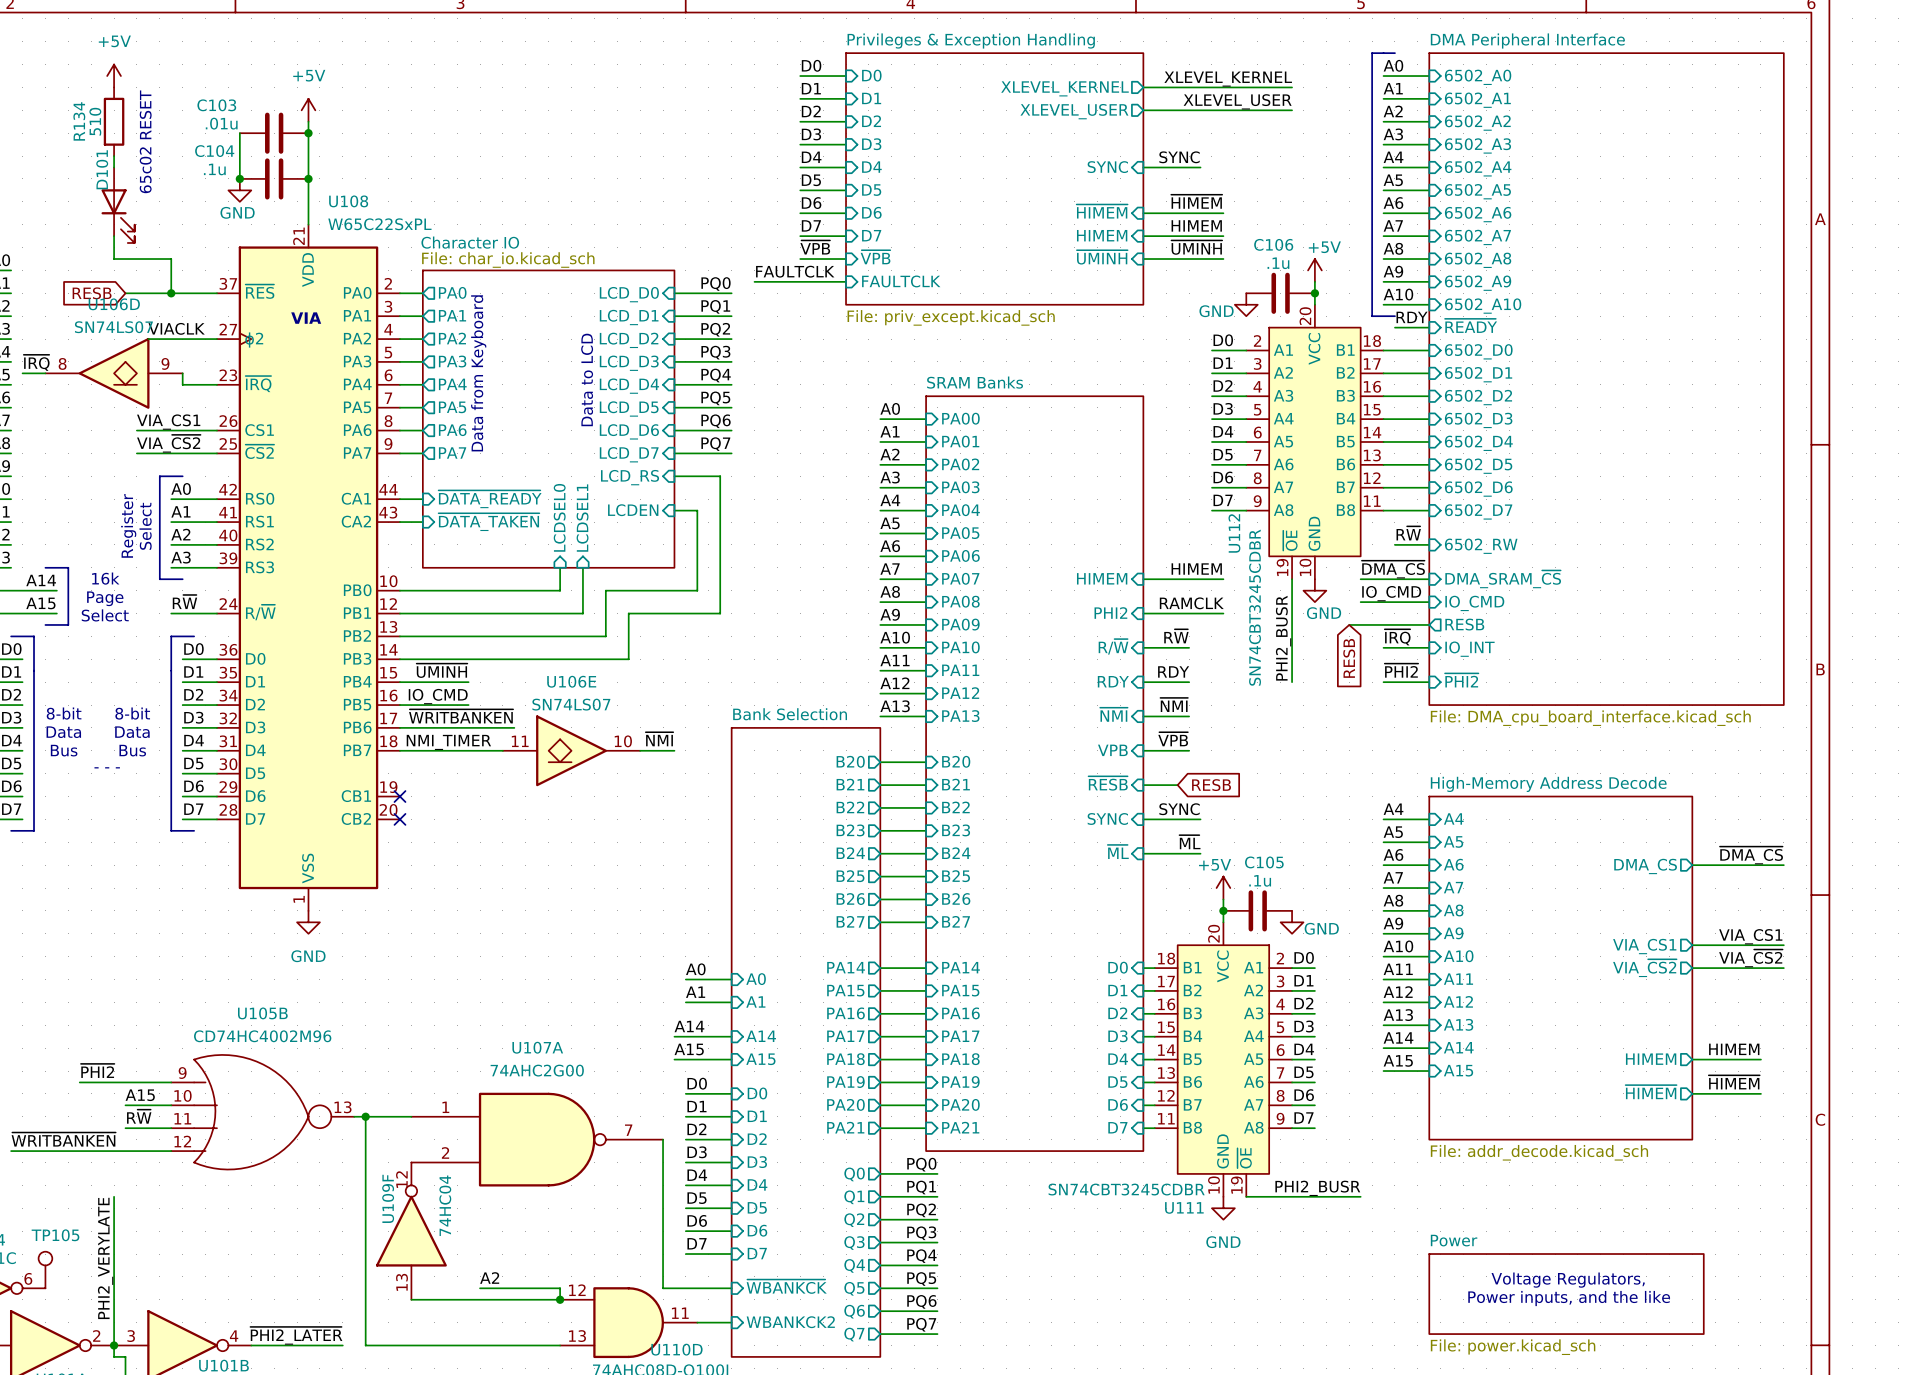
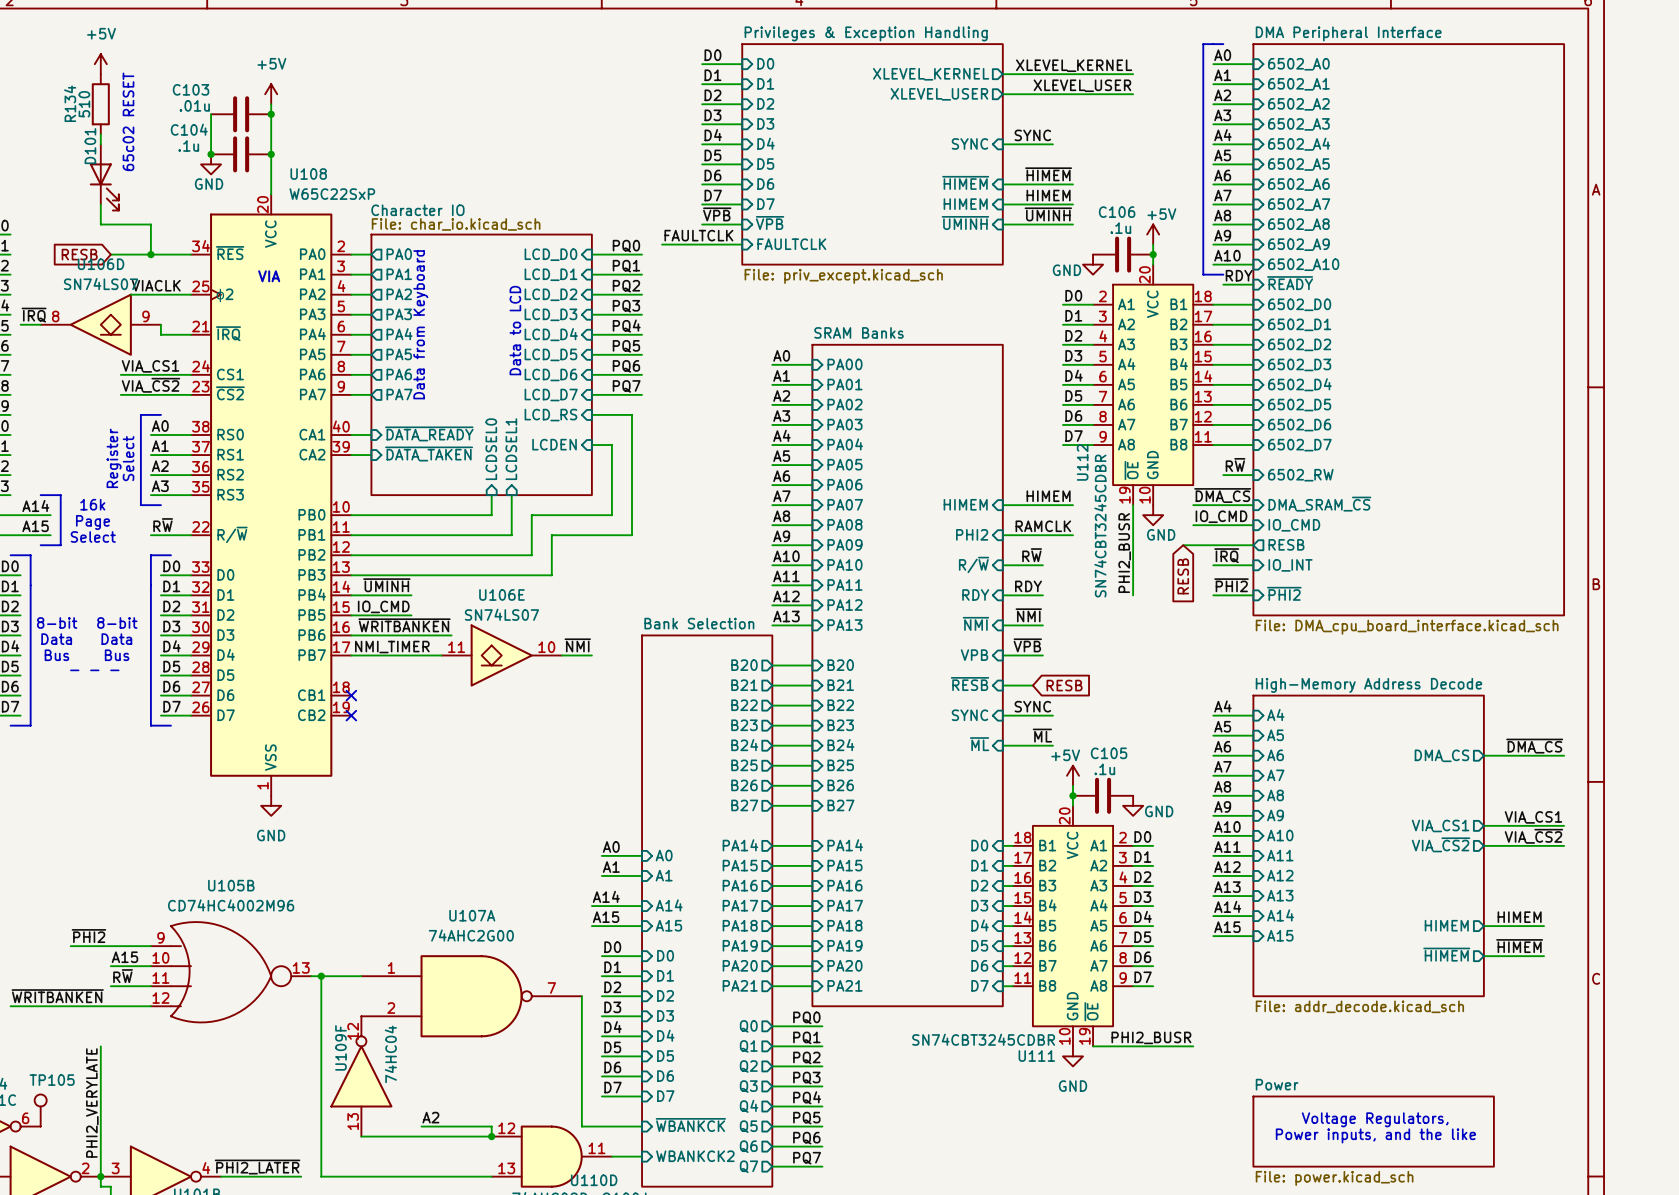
U108 symbol: [216, 224, 400, 911] -> [191, 194, 352, 796]
U108 value: W65C22SxPL (379, 224) -> W65C22SxP (332, 194)

